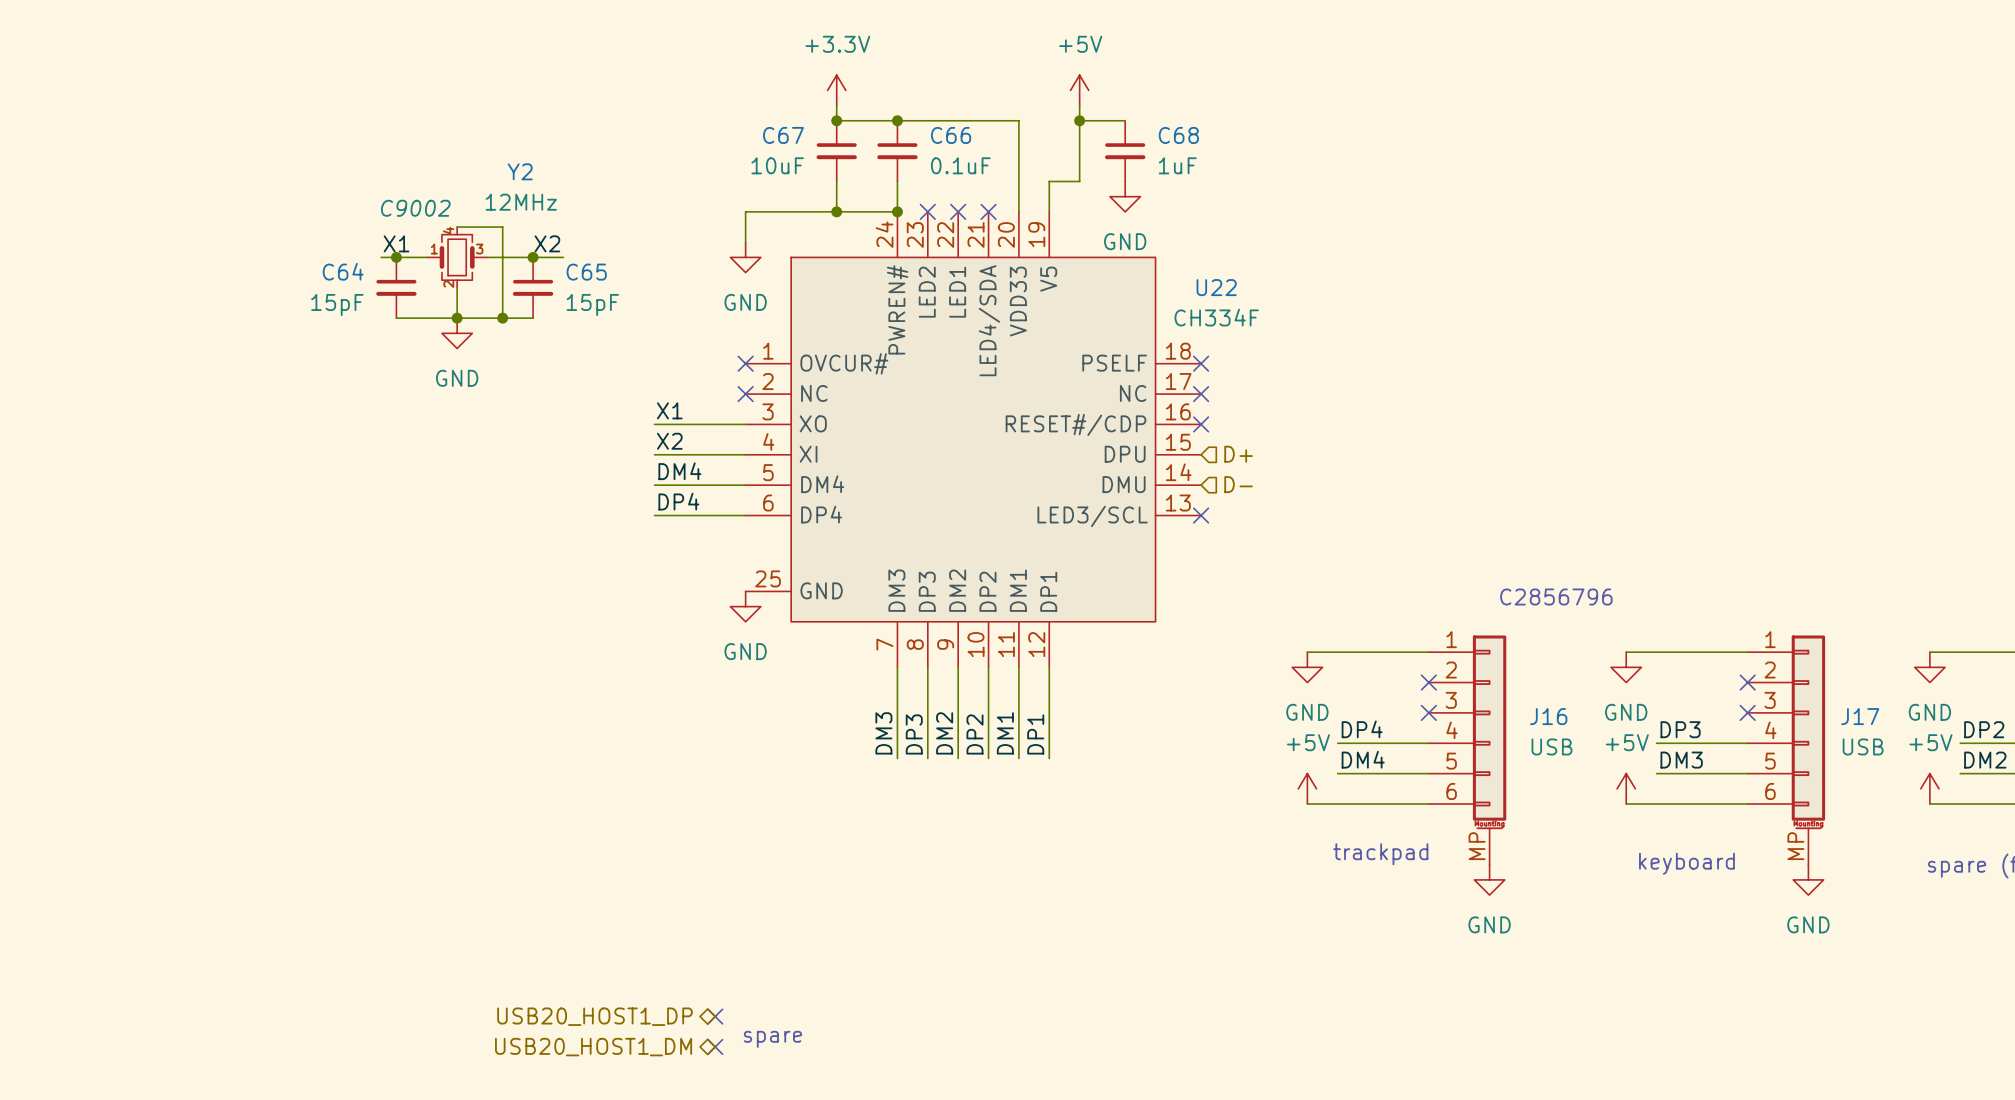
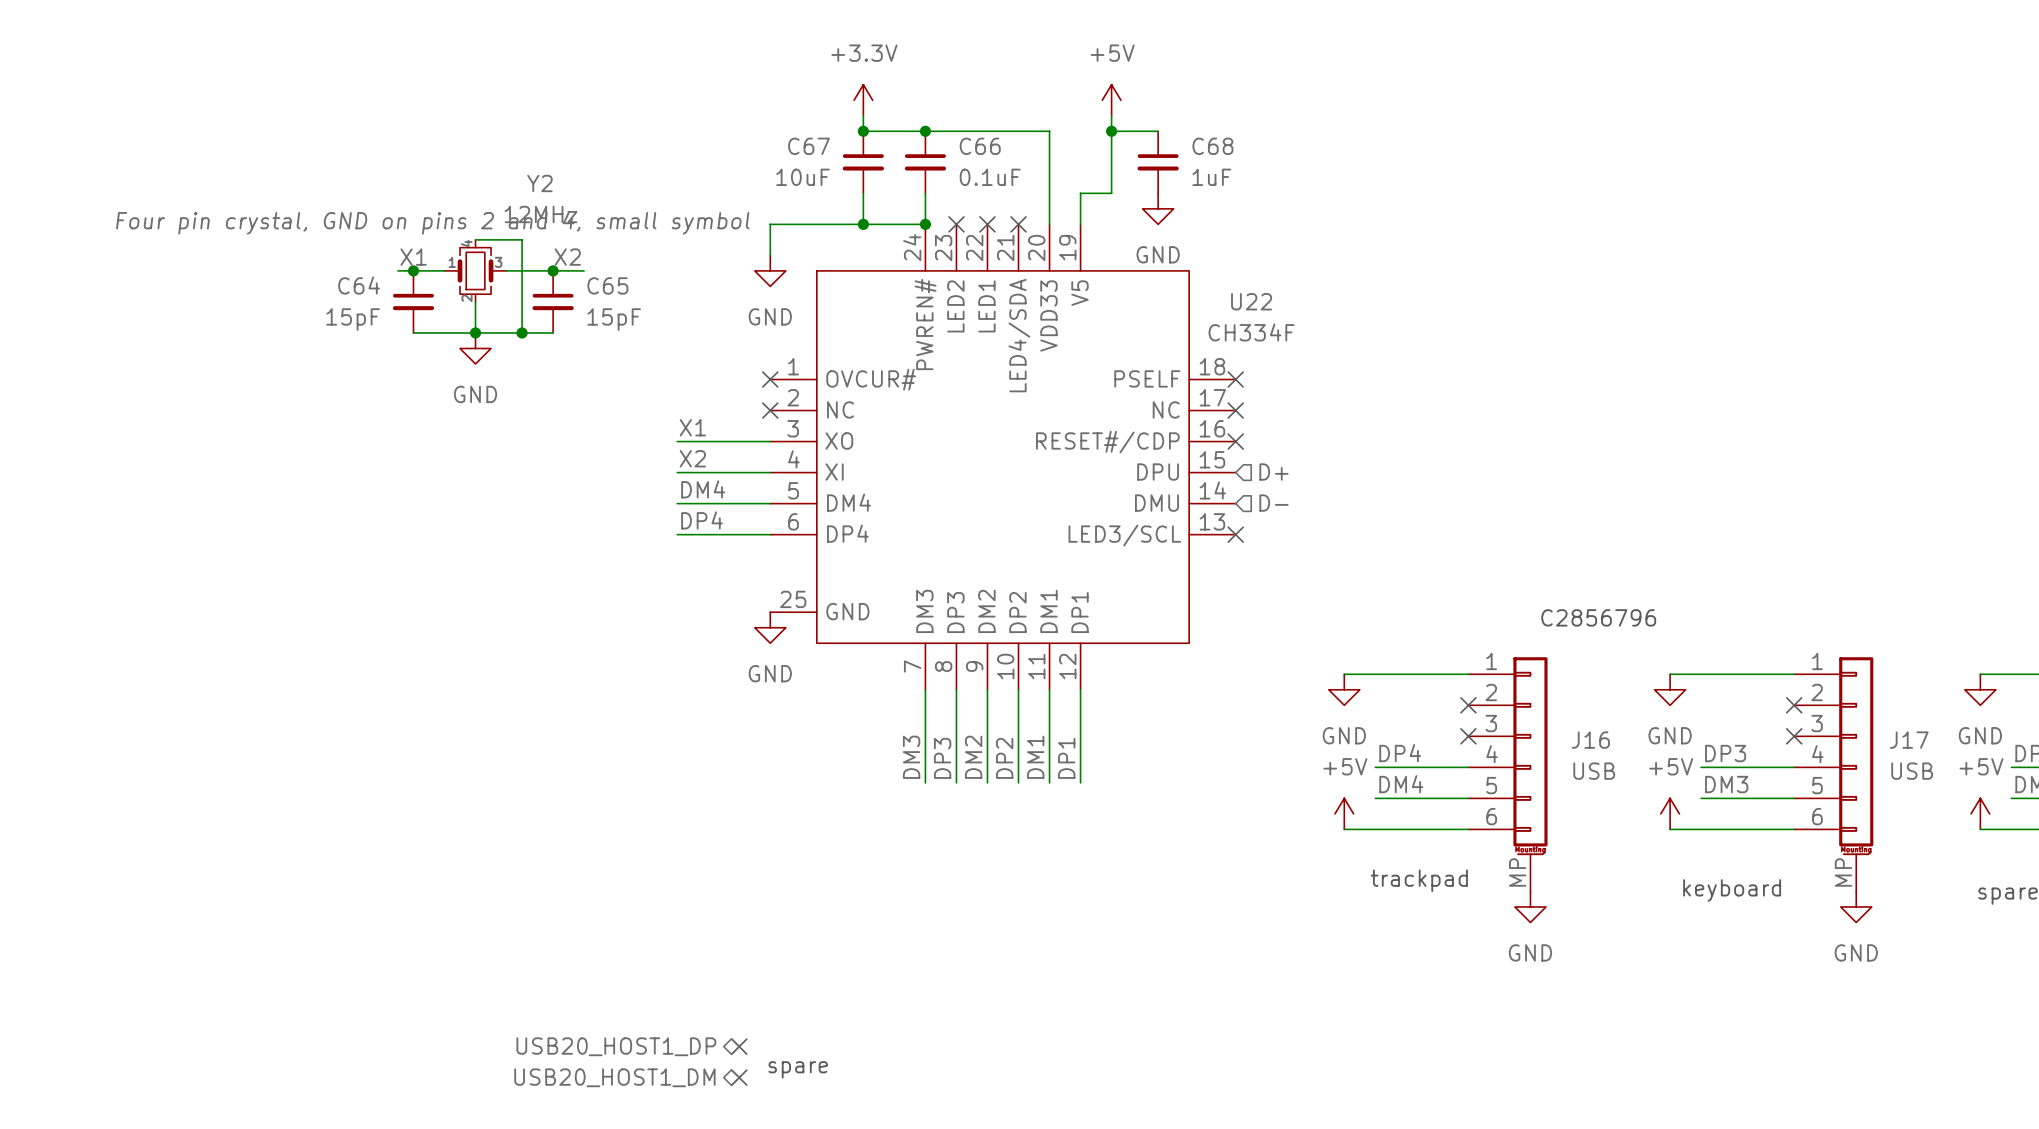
Y2 text: C9002 (415, 208) -> Four pin crystal, GND on pins 2 and 4, small symbol (432, 222)

